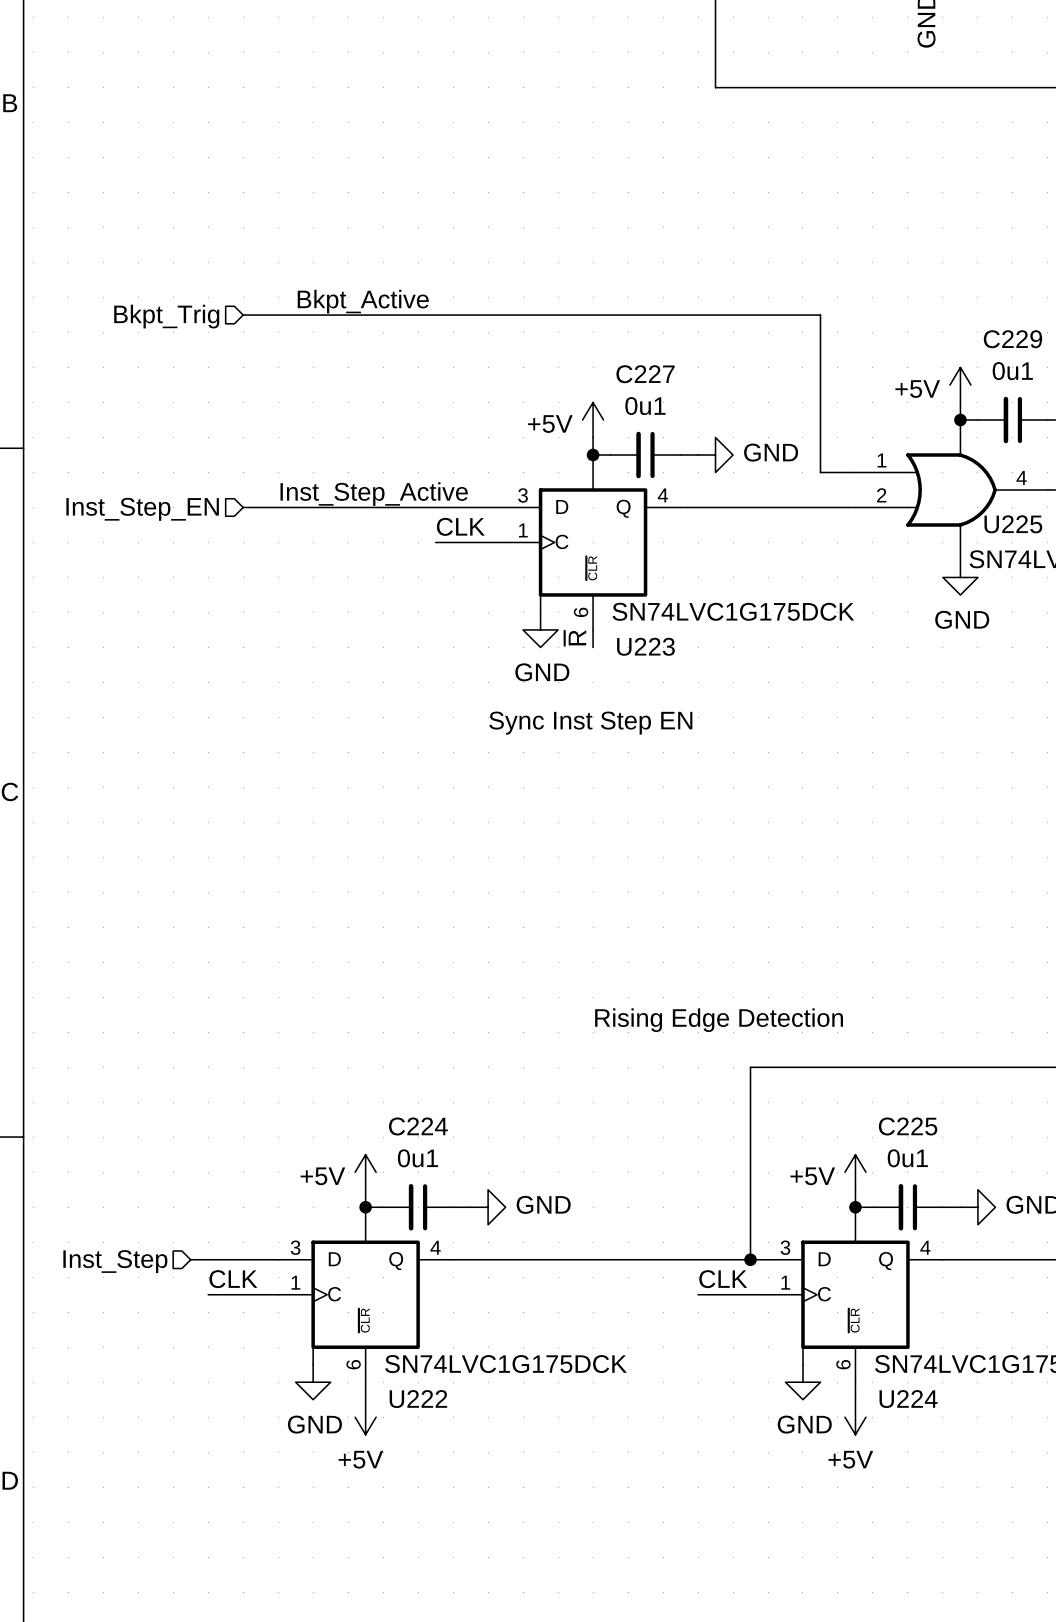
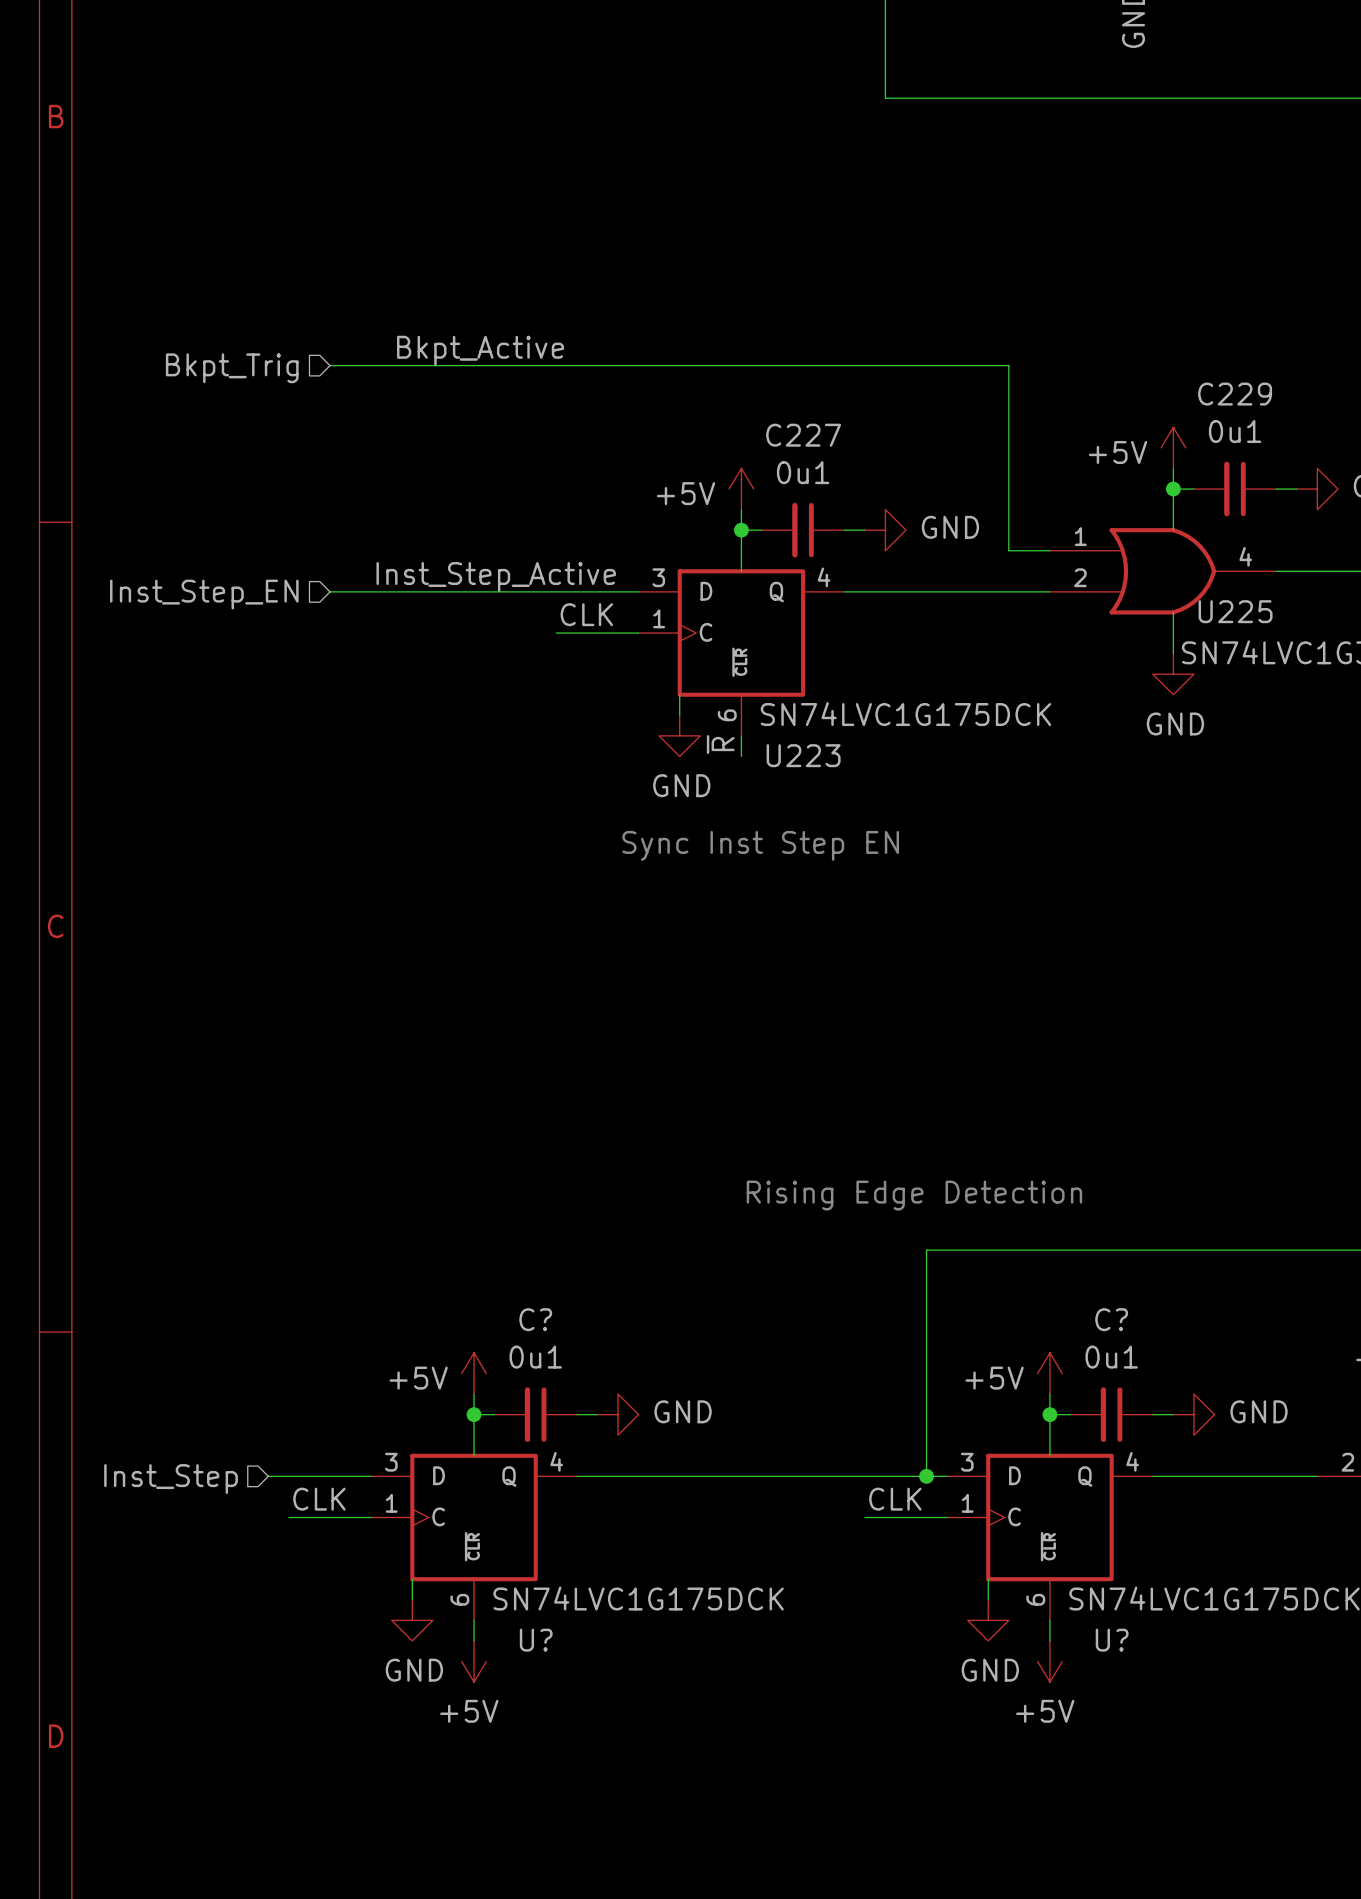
C224 name: C224 (418, 1126) -> C? (535, 1319)
C225 name: C225 (908, 1126) -> C? (1111, 1319)
U222 name: U222 (418, 1399) -> U? (536, 1640)
U224 name: U224 (908, 1399) -> U? (1112, 1640)

